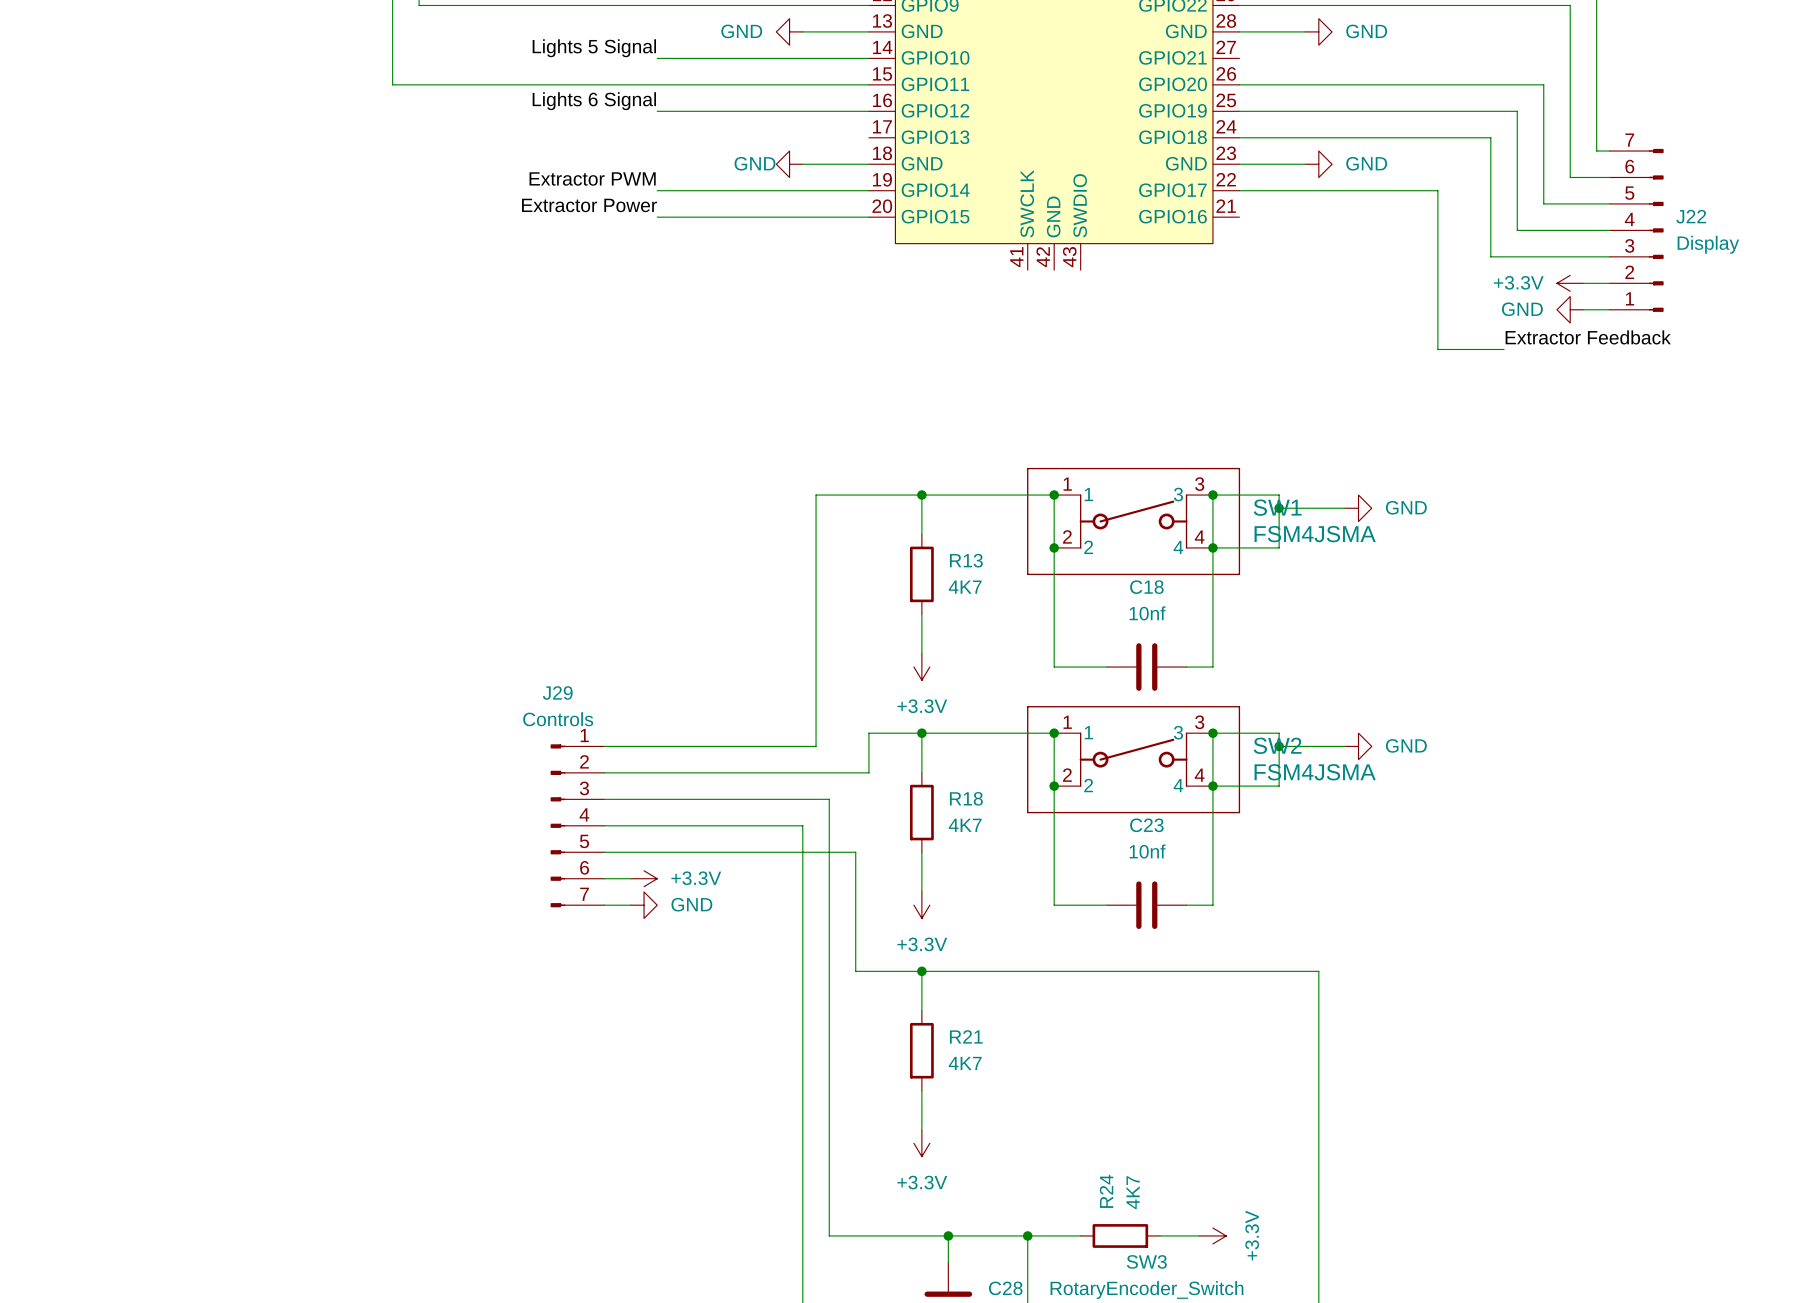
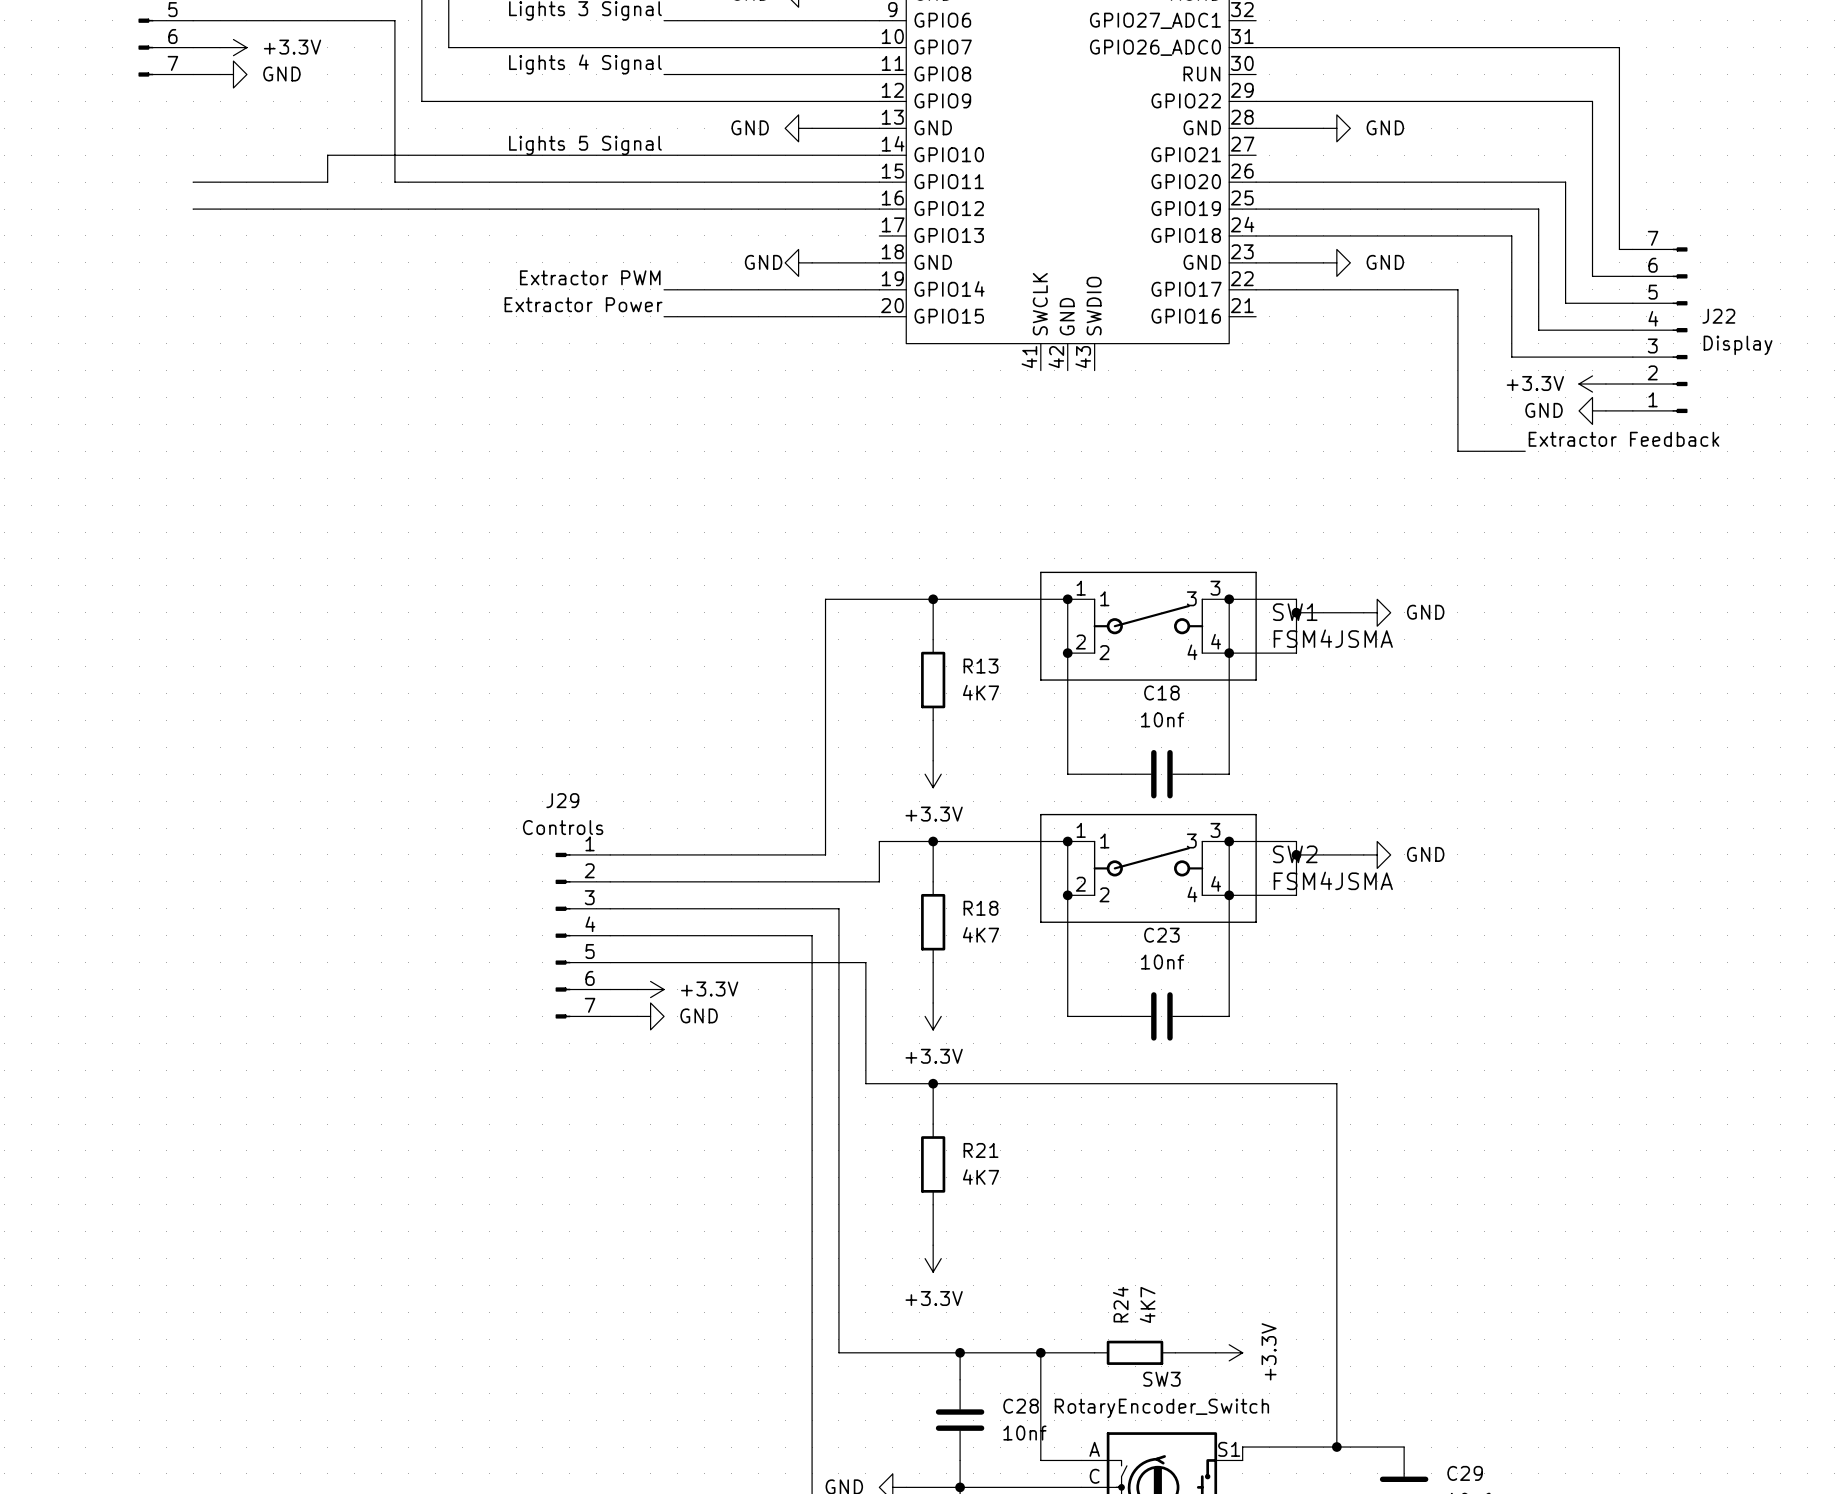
wire: none -> (664, 155) (327, 155) (327, 182) (193, 182)
label: Lights 6 Signal (594, 101) -> none
wire: none -> (193, 209) (664, 209)

